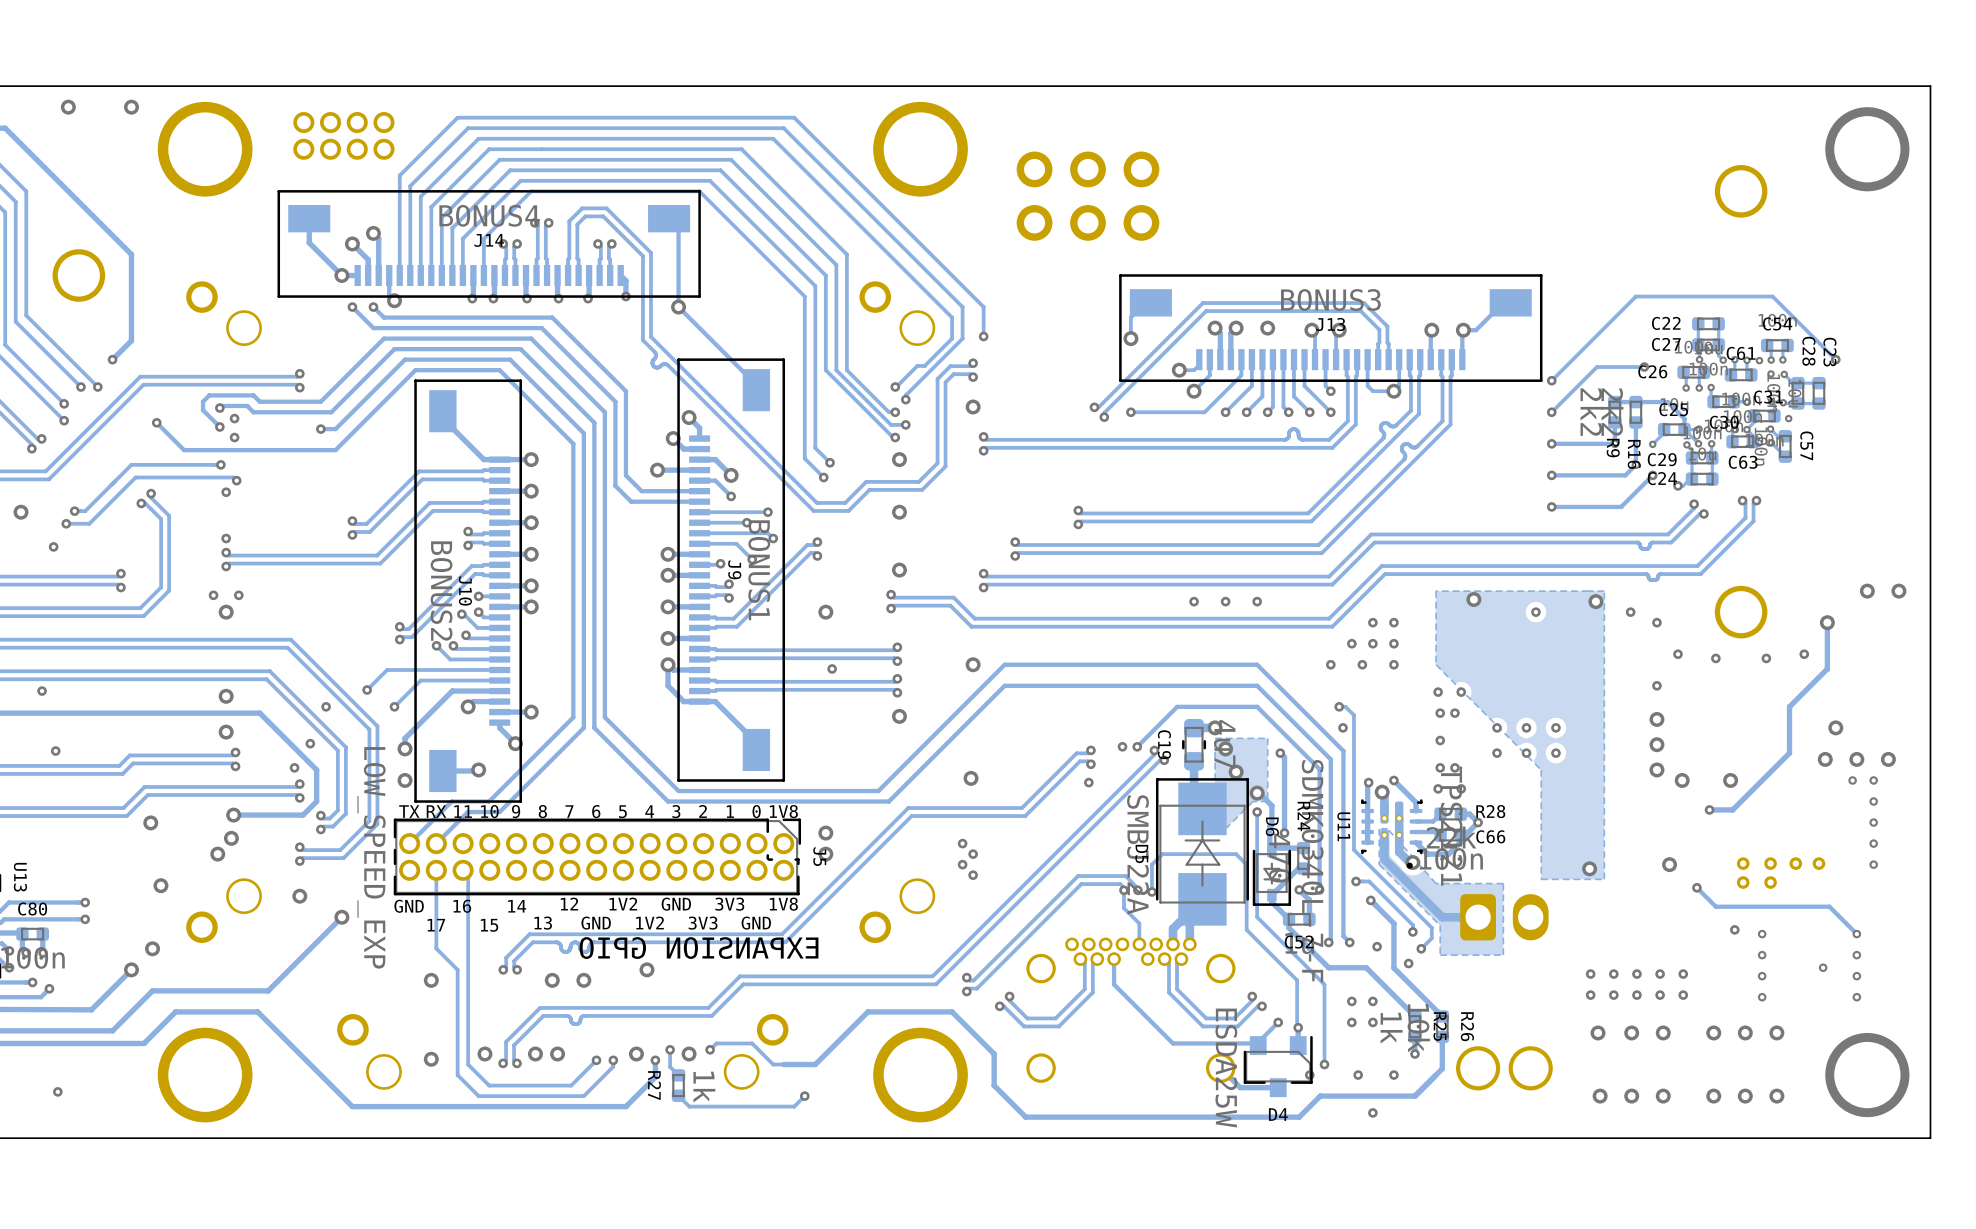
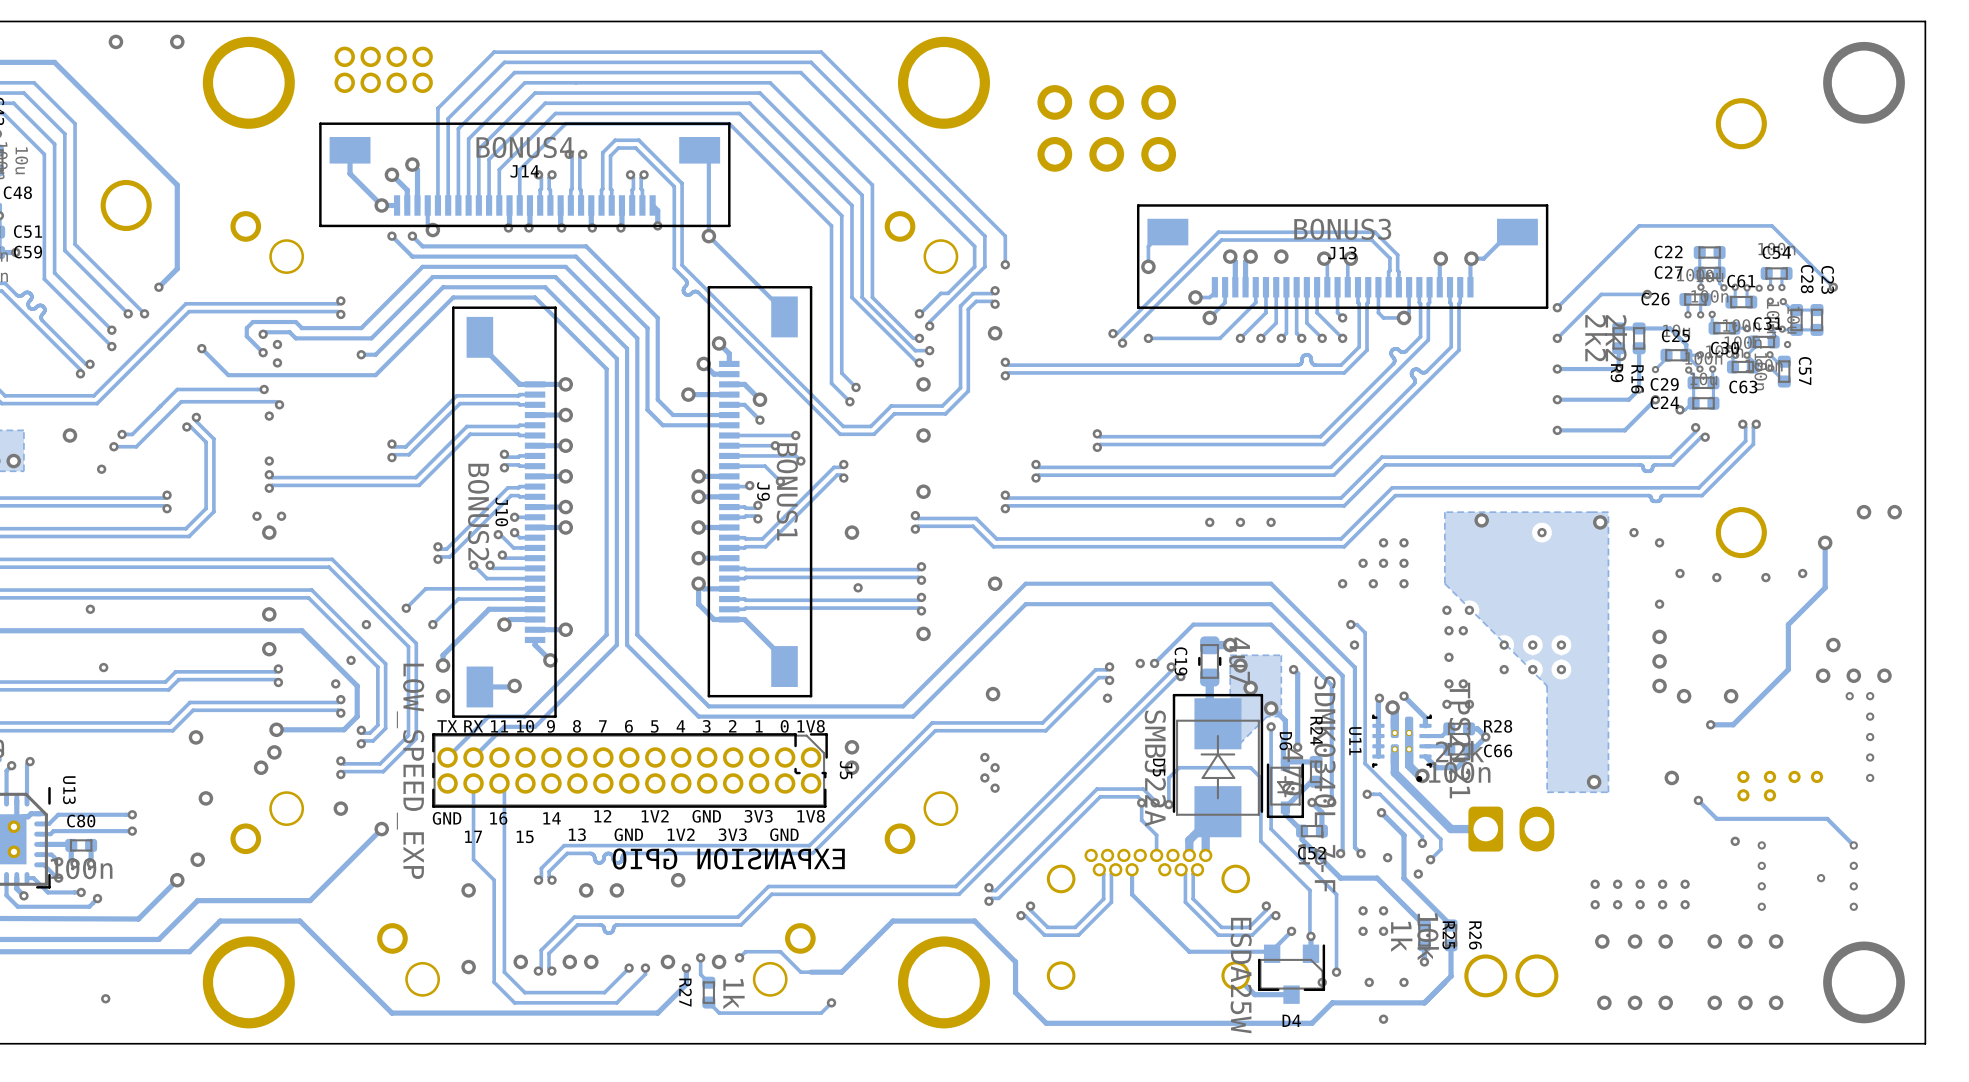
zone outline: (1387, 828) (1436, 883) (1503, 883) (1503, 955) (1440, 955) (1440, 925) (1379, 864) (1379, 828) (1387, 828) -> none

